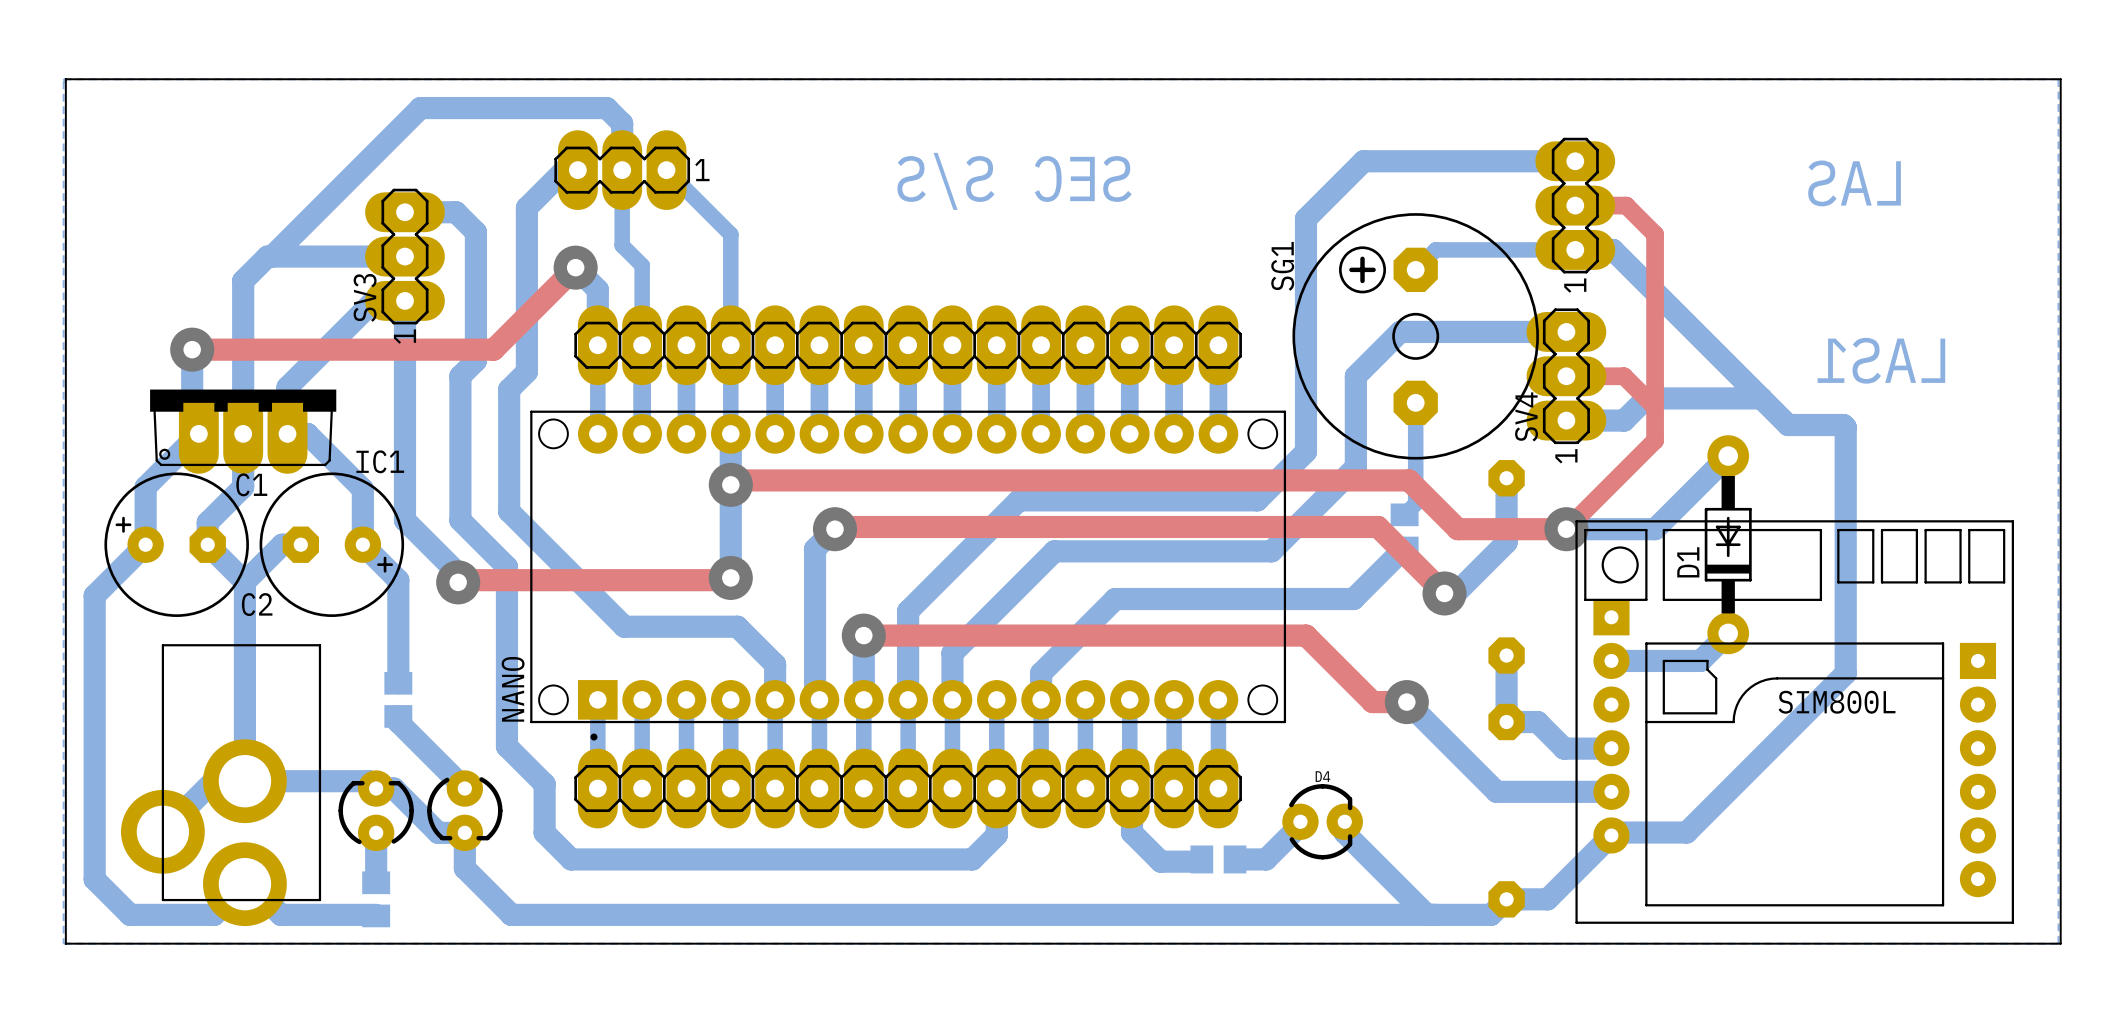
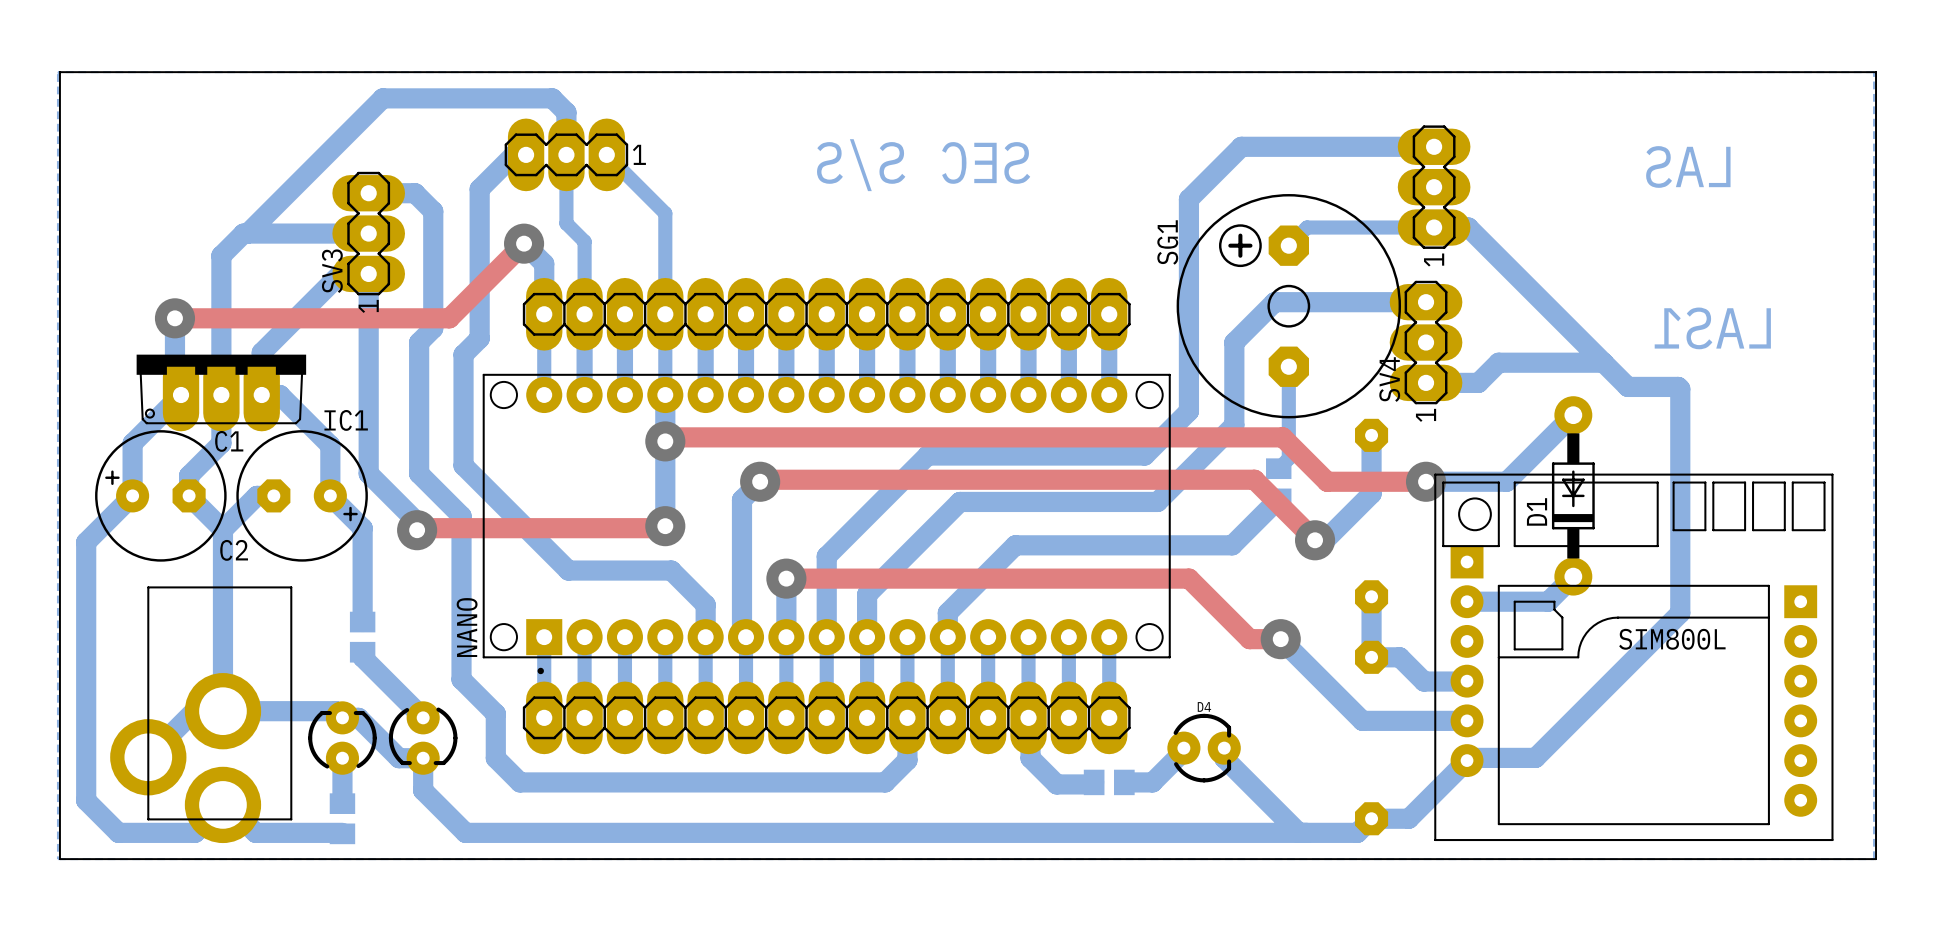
top track: (1575, 205) (1626, 205) (1655, 234) (1655, 440) (1566, 529) -> none
top track: (1566, 376) (1624, 376) (1655, 407) -> none

